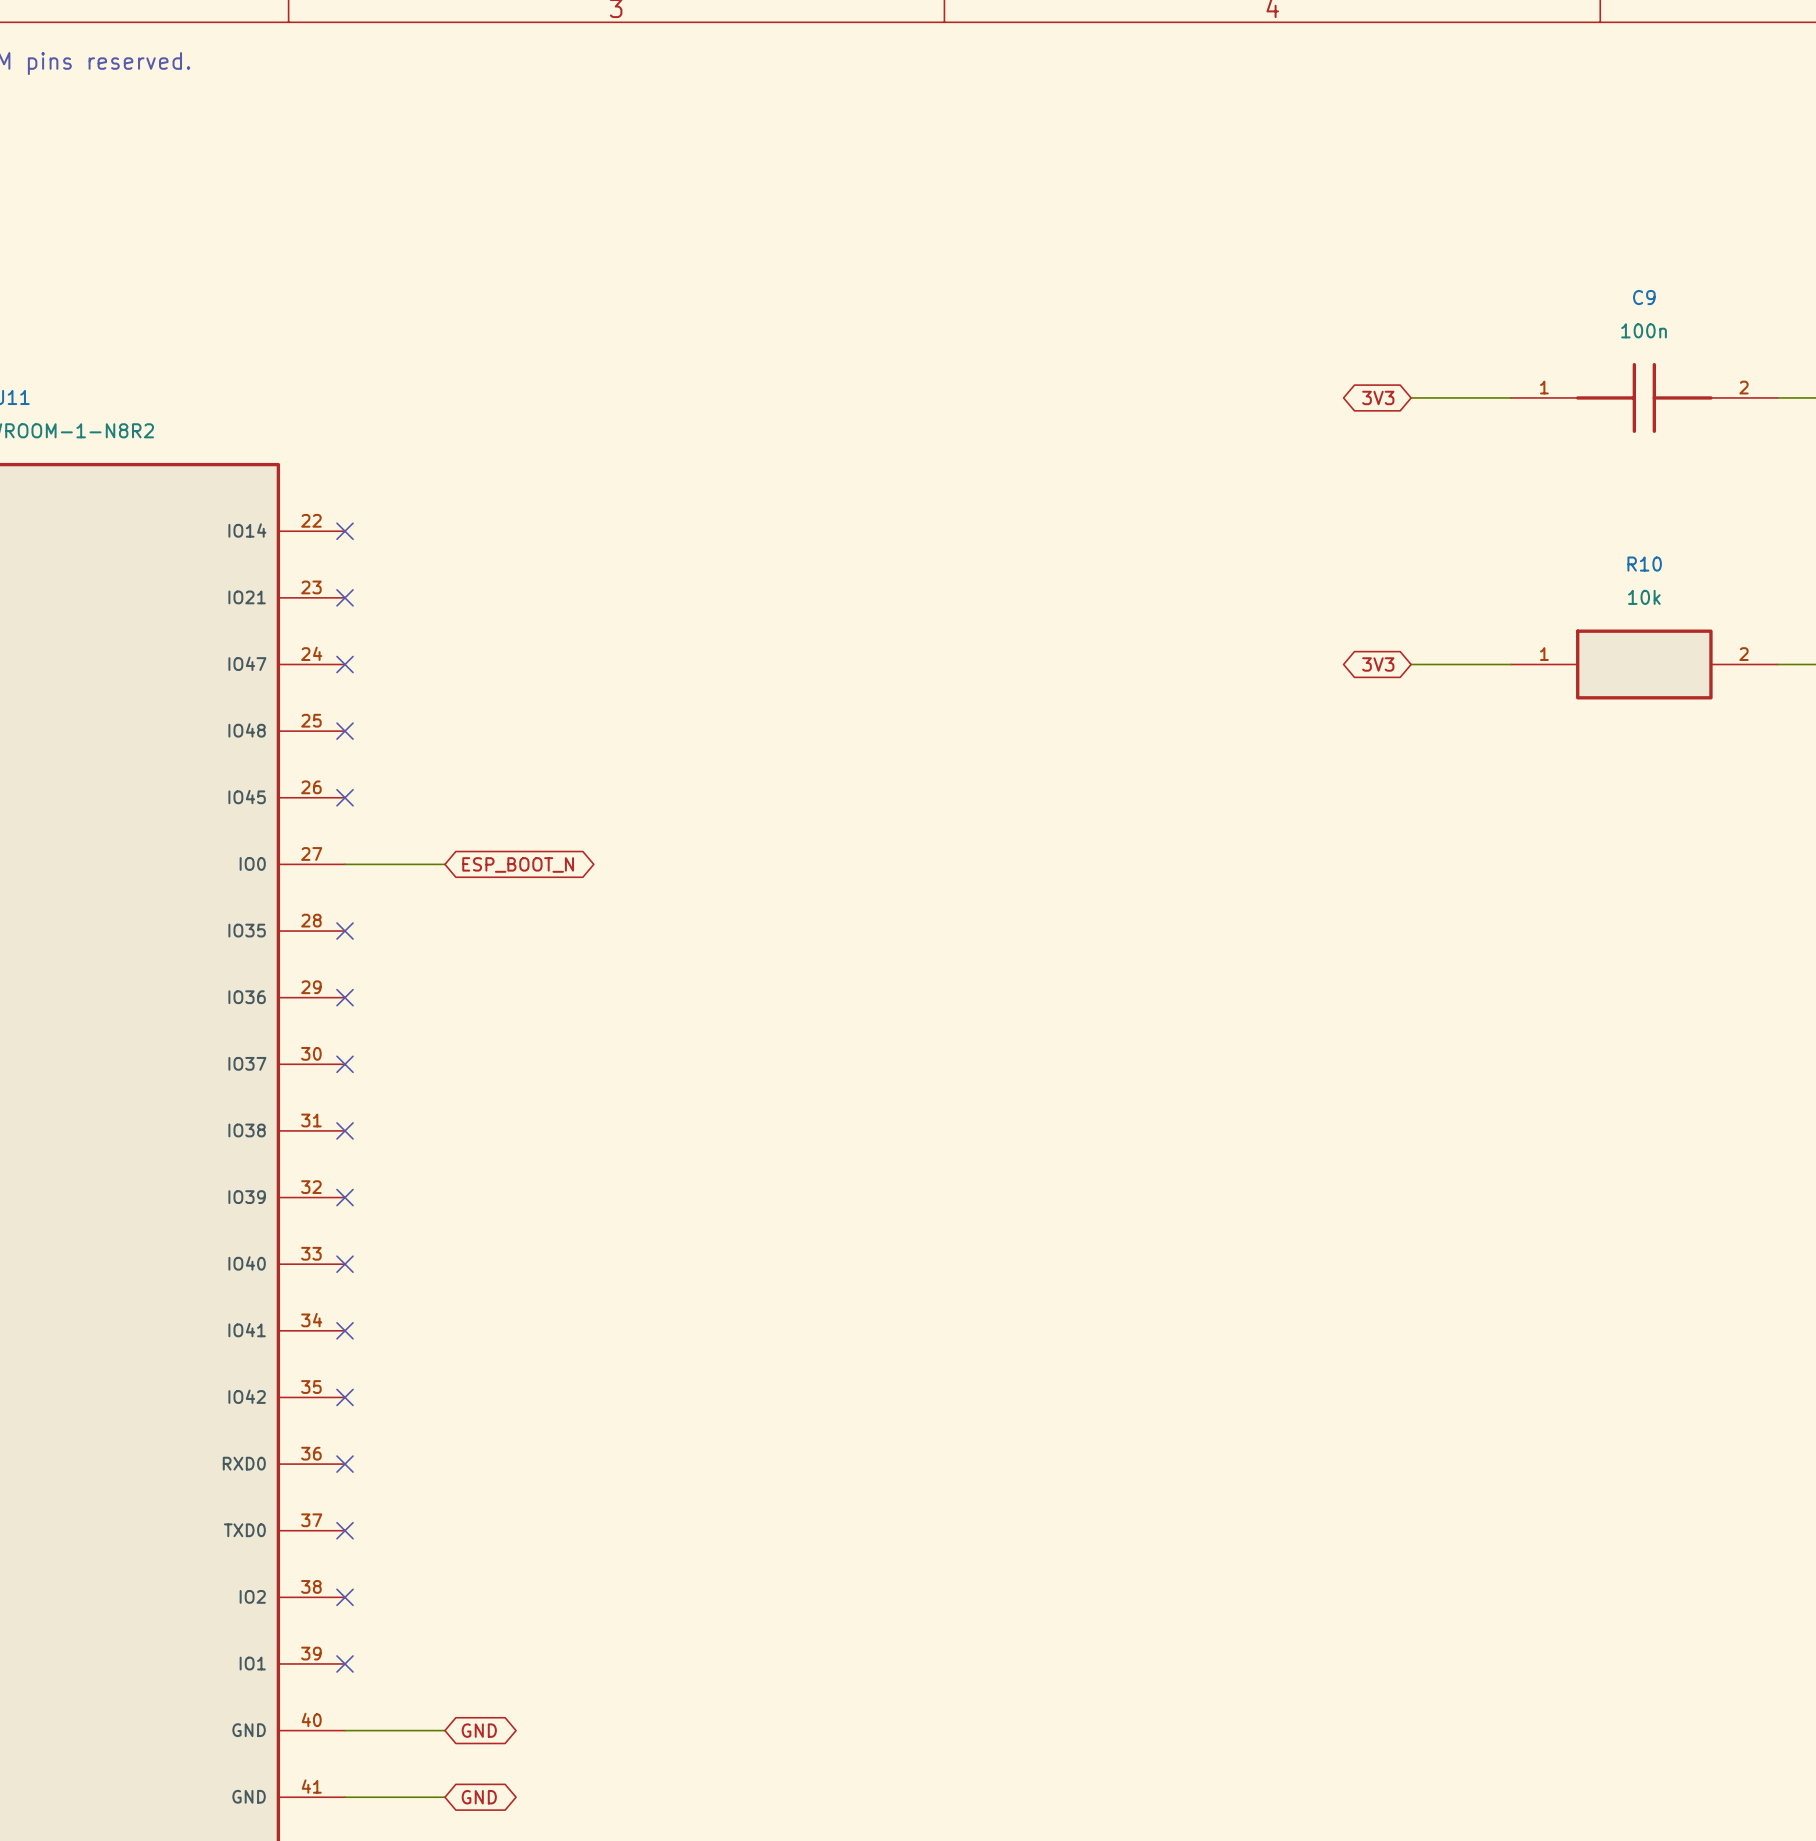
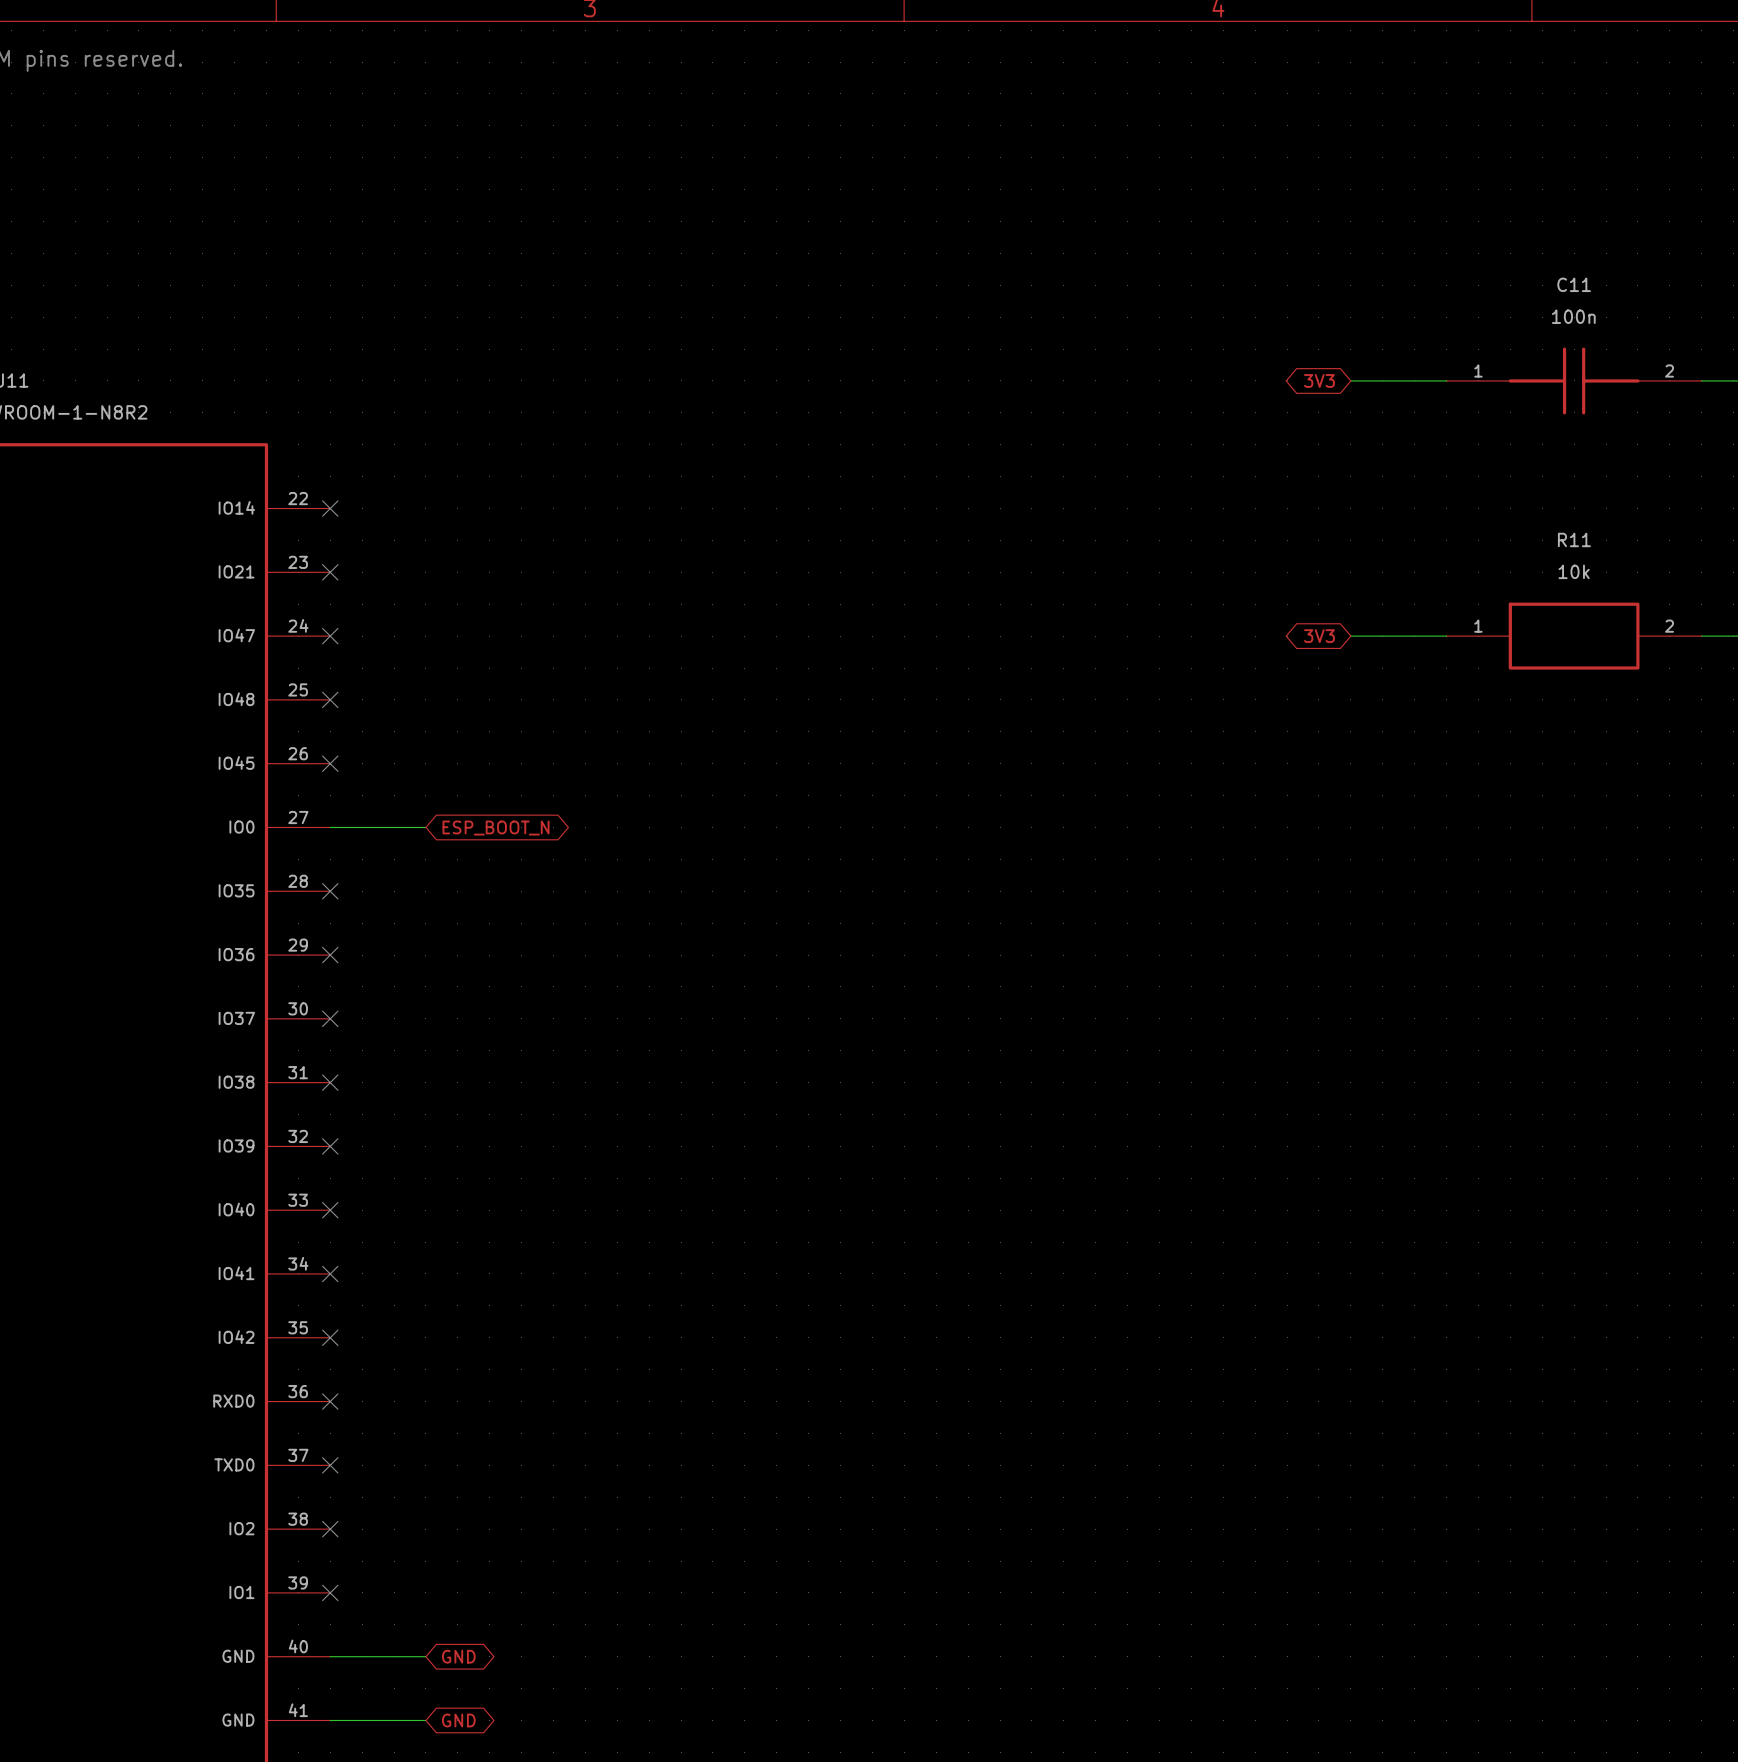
C9 name: C9 (1644, 297) -> C11 (1574, 284)
R10 name: R10 (1644, 564) -> R11 (1574, 539)

